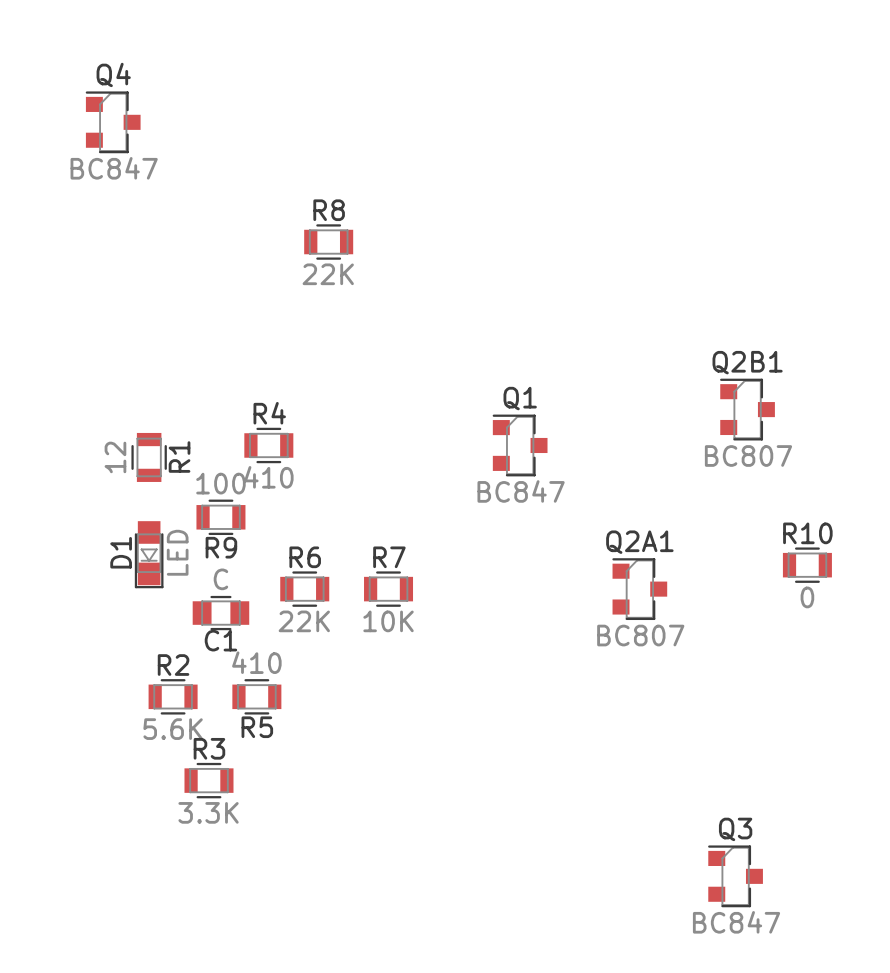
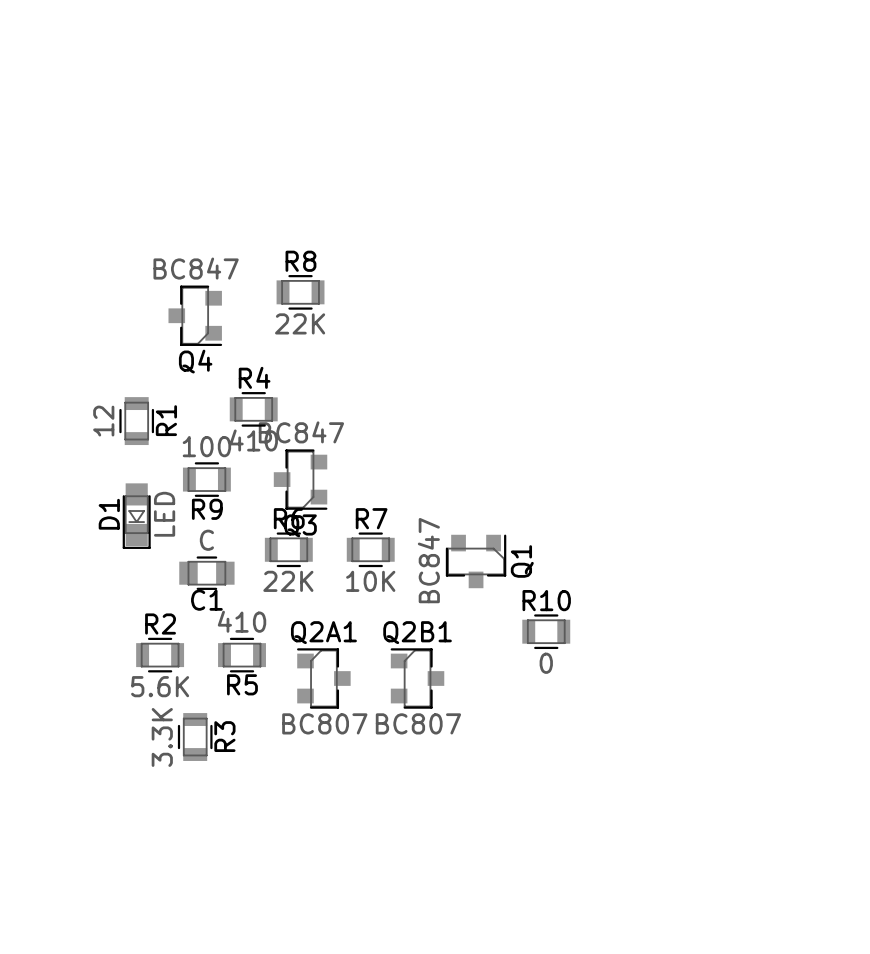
Q4 rotation: 0° (113, 122) -> 180° (195, 315)
Q4 position: (113, 122) -> (195, 315)
R8 position: (328, 242) -> (300, 292)
Q2B1 position: (747, 409) -> (417, 678)
Q1 rotation: 0° (520, 445) -> 90° clockwise (476, 561)
Q1 position: (520, 445) -> (476, 561)
R10 position: (807, 565) -> (546, 631)
Q2A1 position: (639, 589) -> (323, 678)
R3 rotation: 0° (208, 780) -> 90° clockwise (195, 737)
Q3 rotation: 0° (735, 876) -> 180° (300, 479)
Q3 position: (735, 876) -> (300, 479)

